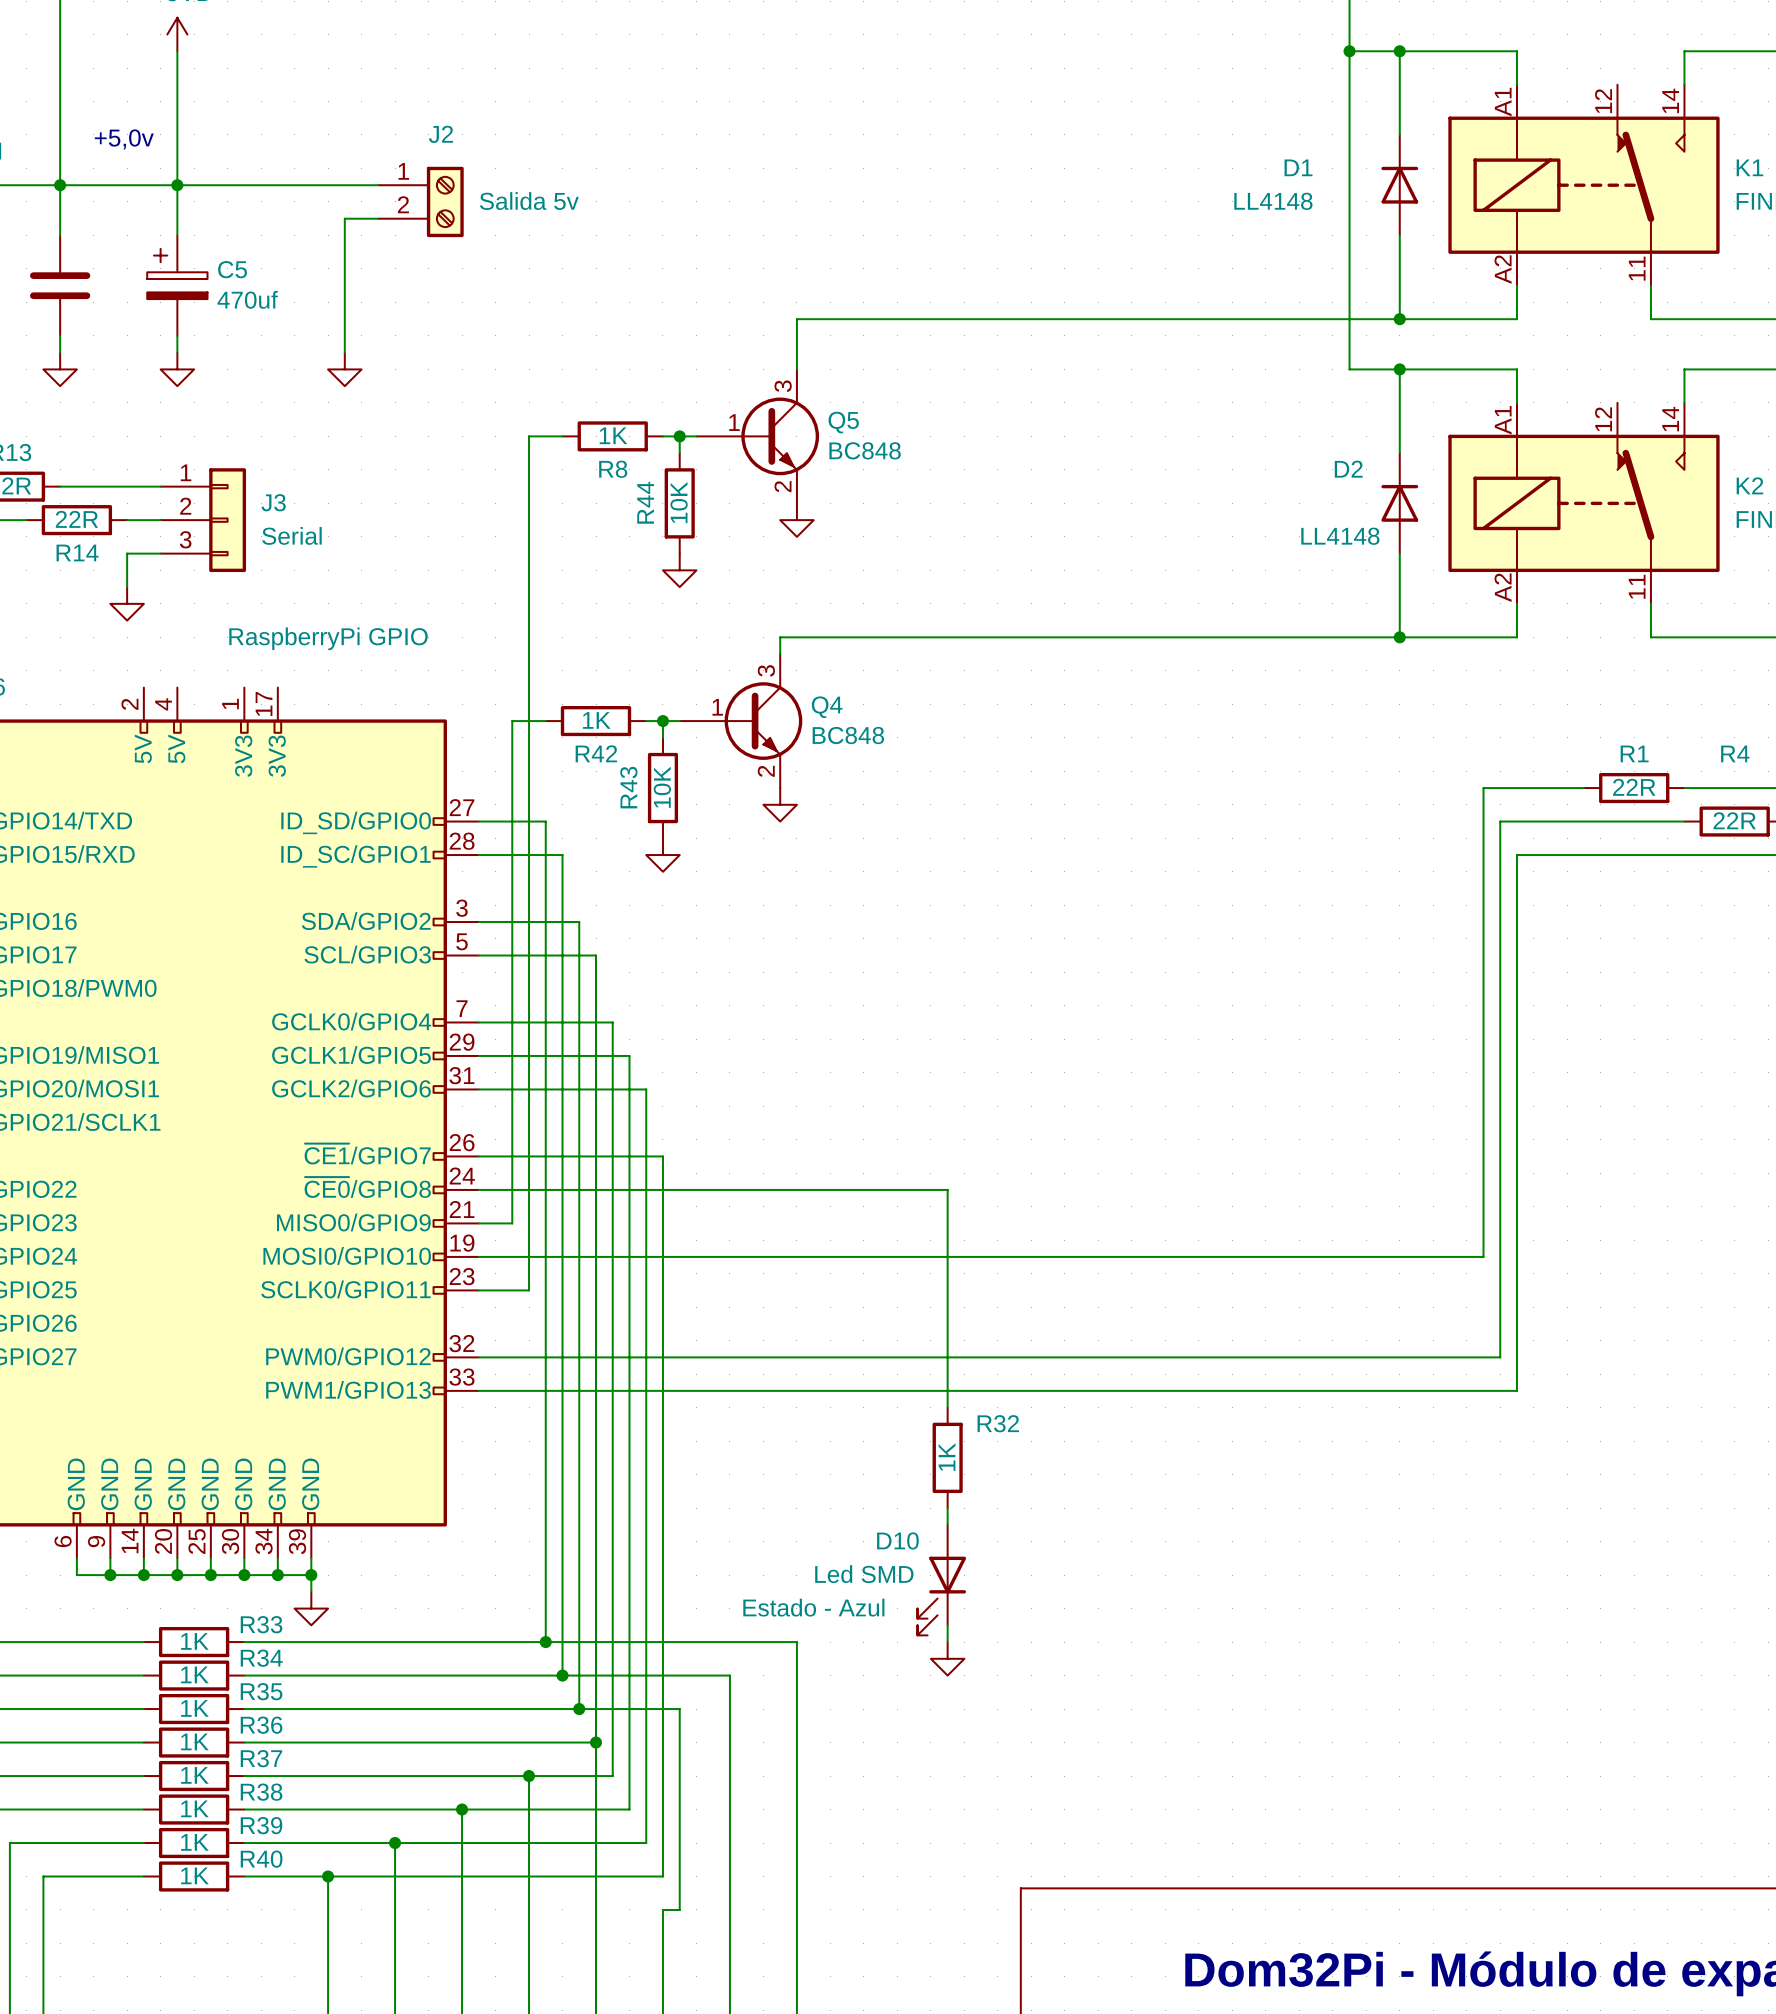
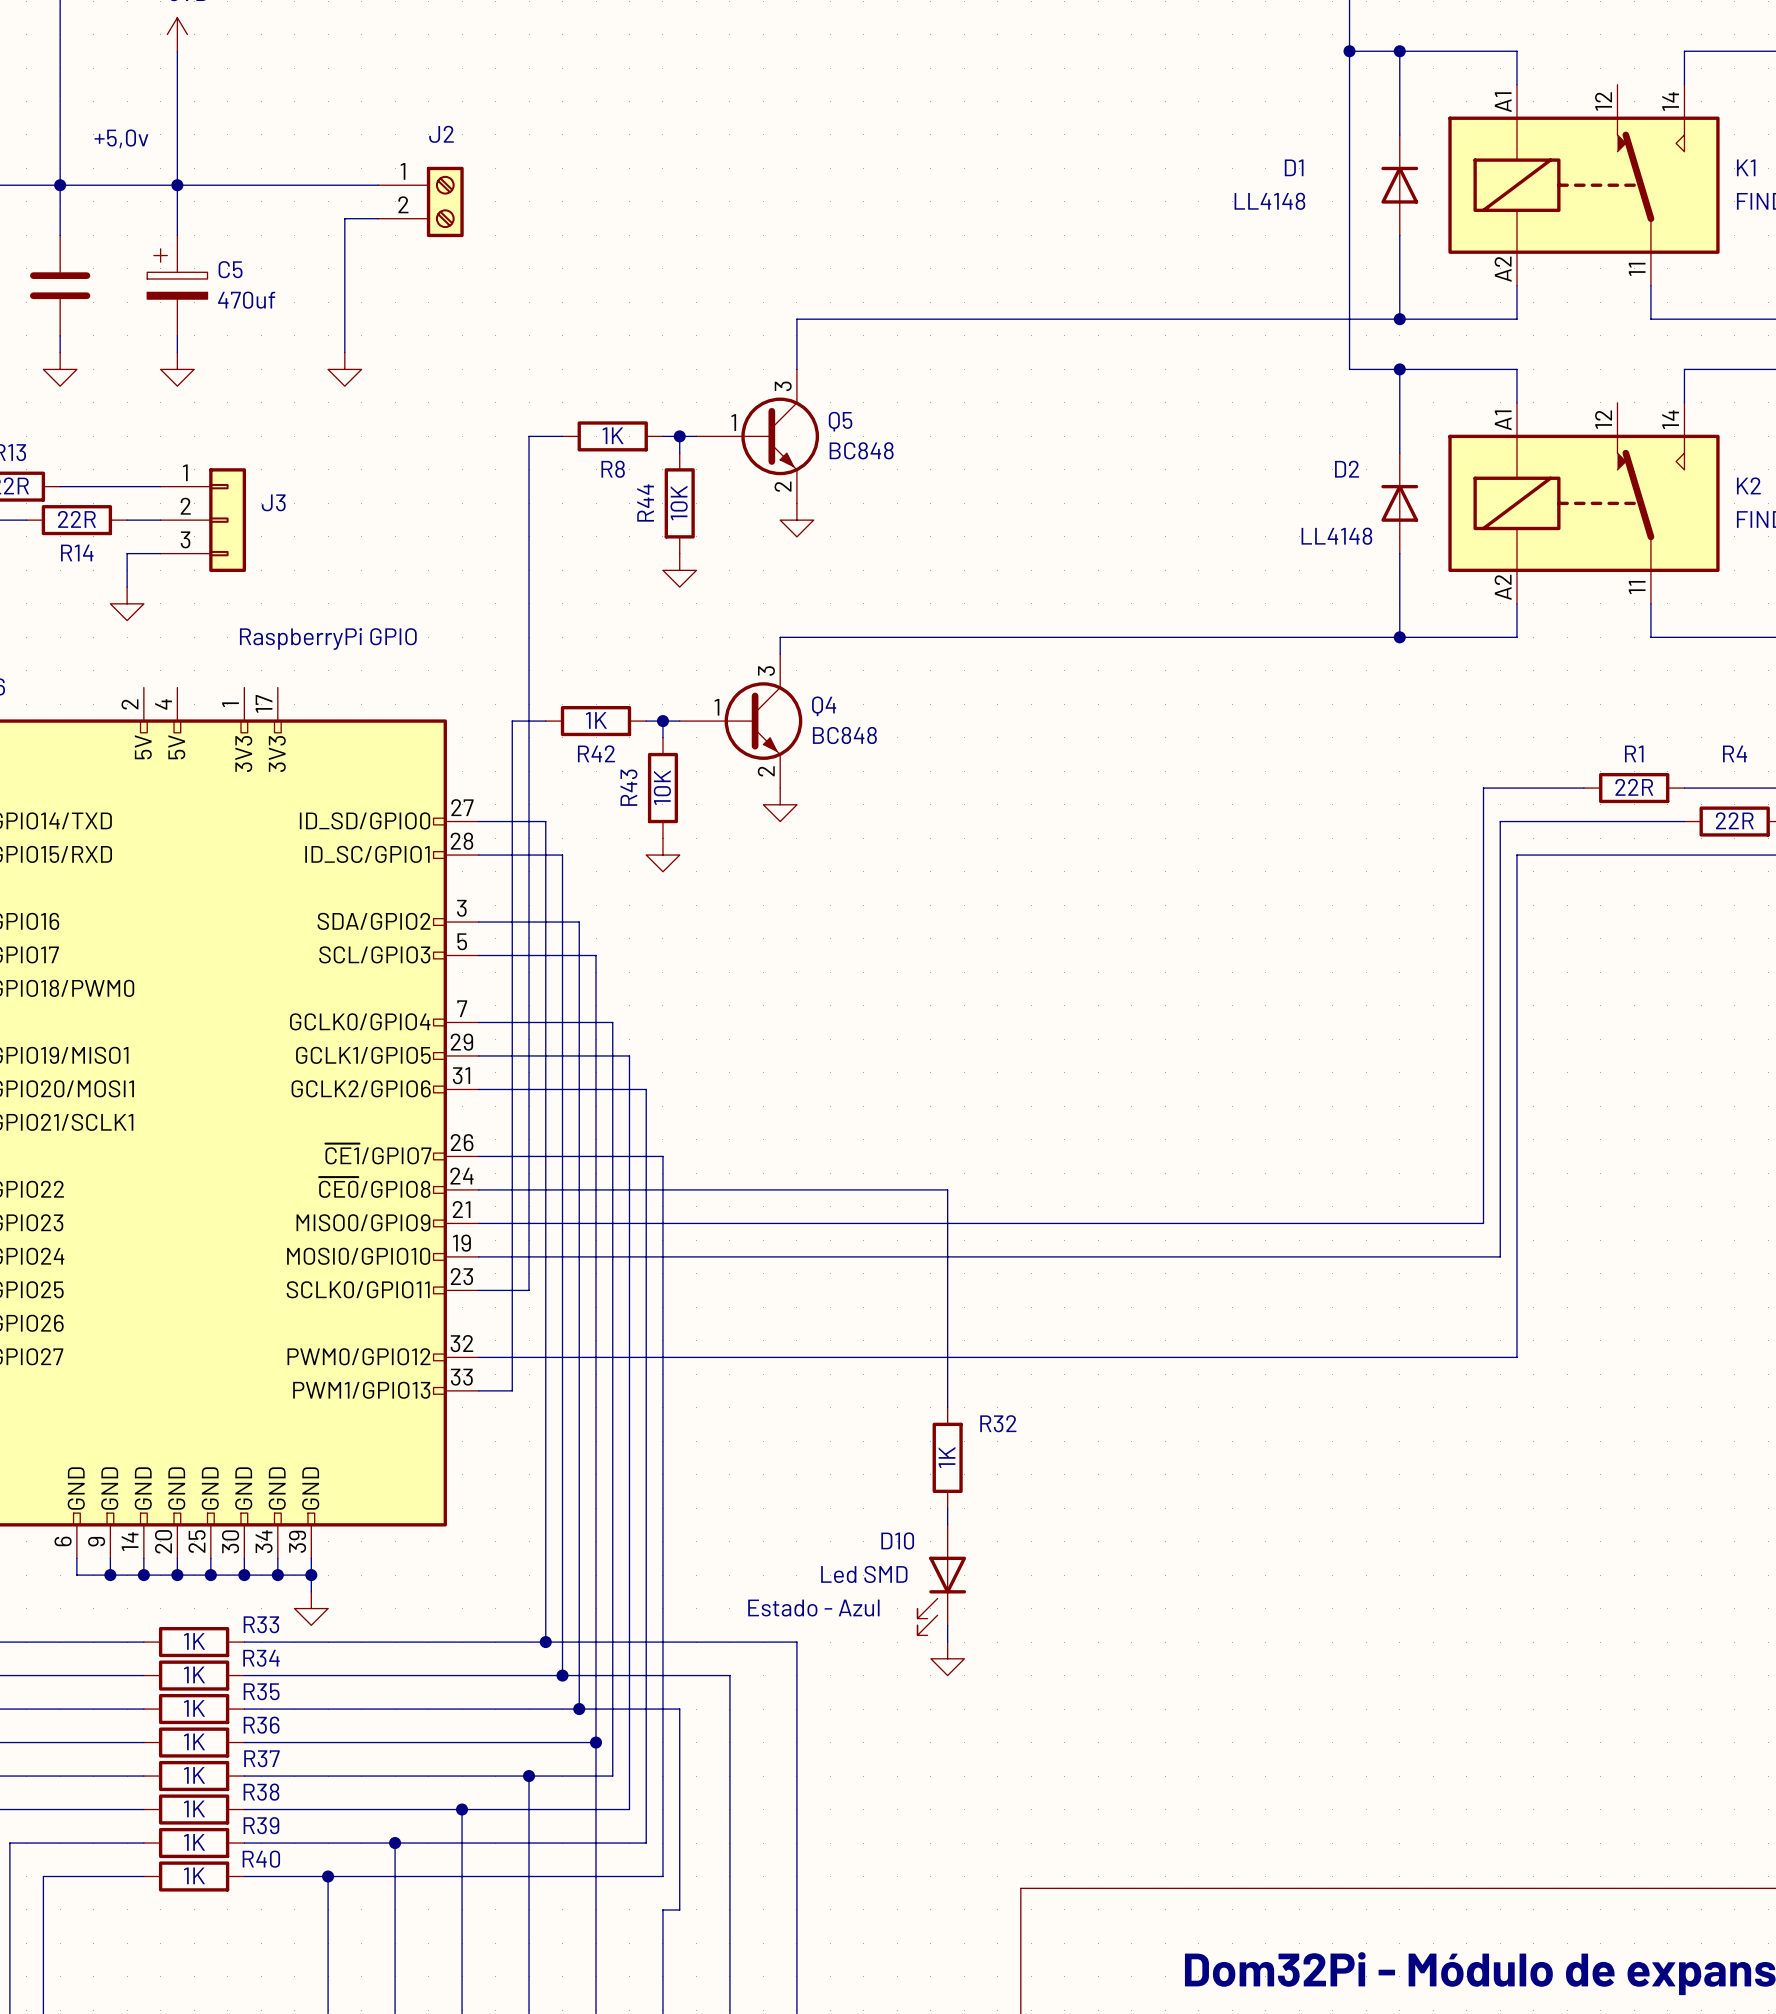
J2 value: Salida 5v (529, 201) -> none
J3 value: Serial (291, 535) -> none
wire: (1483, 1223) (1483, 1256) -> (1500, 1256) (1483, 1256)
wire: (1500, 1256) (1500, 1357) -> (1516, 1357) (1500, 1357)
wire: (1516, 1357) (1516, 1390) (512, 1390) -> (1483, 1223) (512, 1223) (512, 1390)

